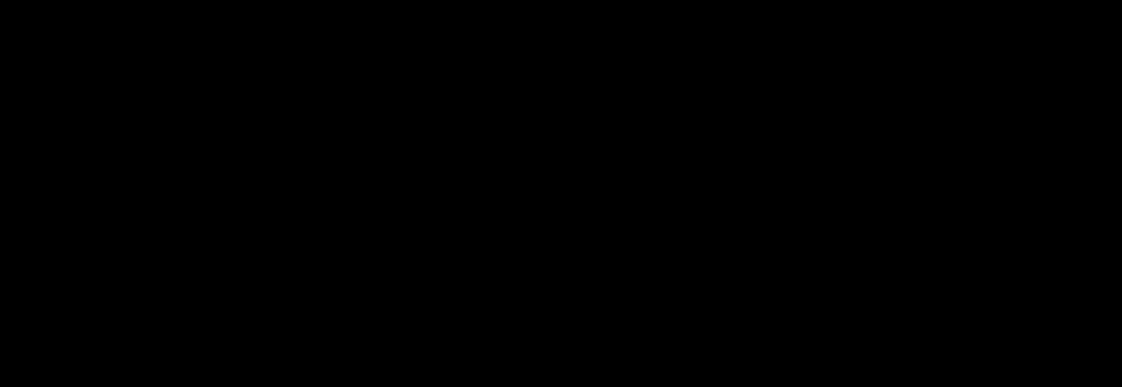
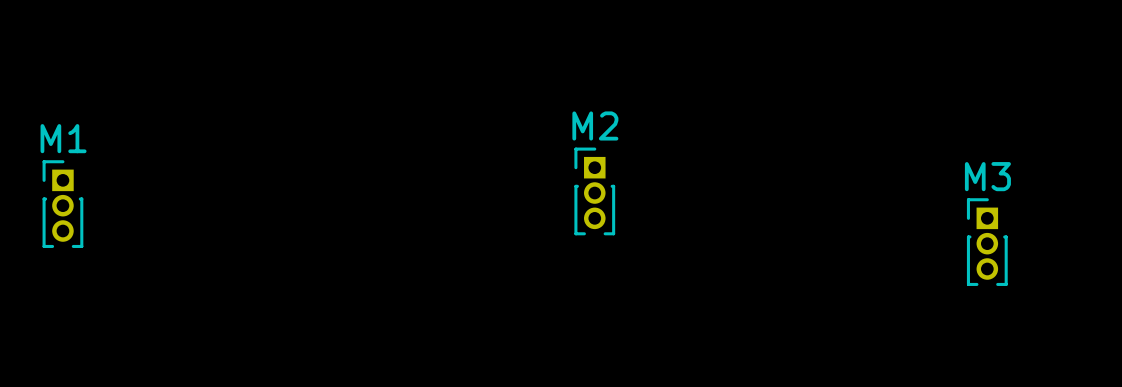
M2: none -> (594, 191)
M1: none -> (62, 204)
M3: none -> (987, 242)

